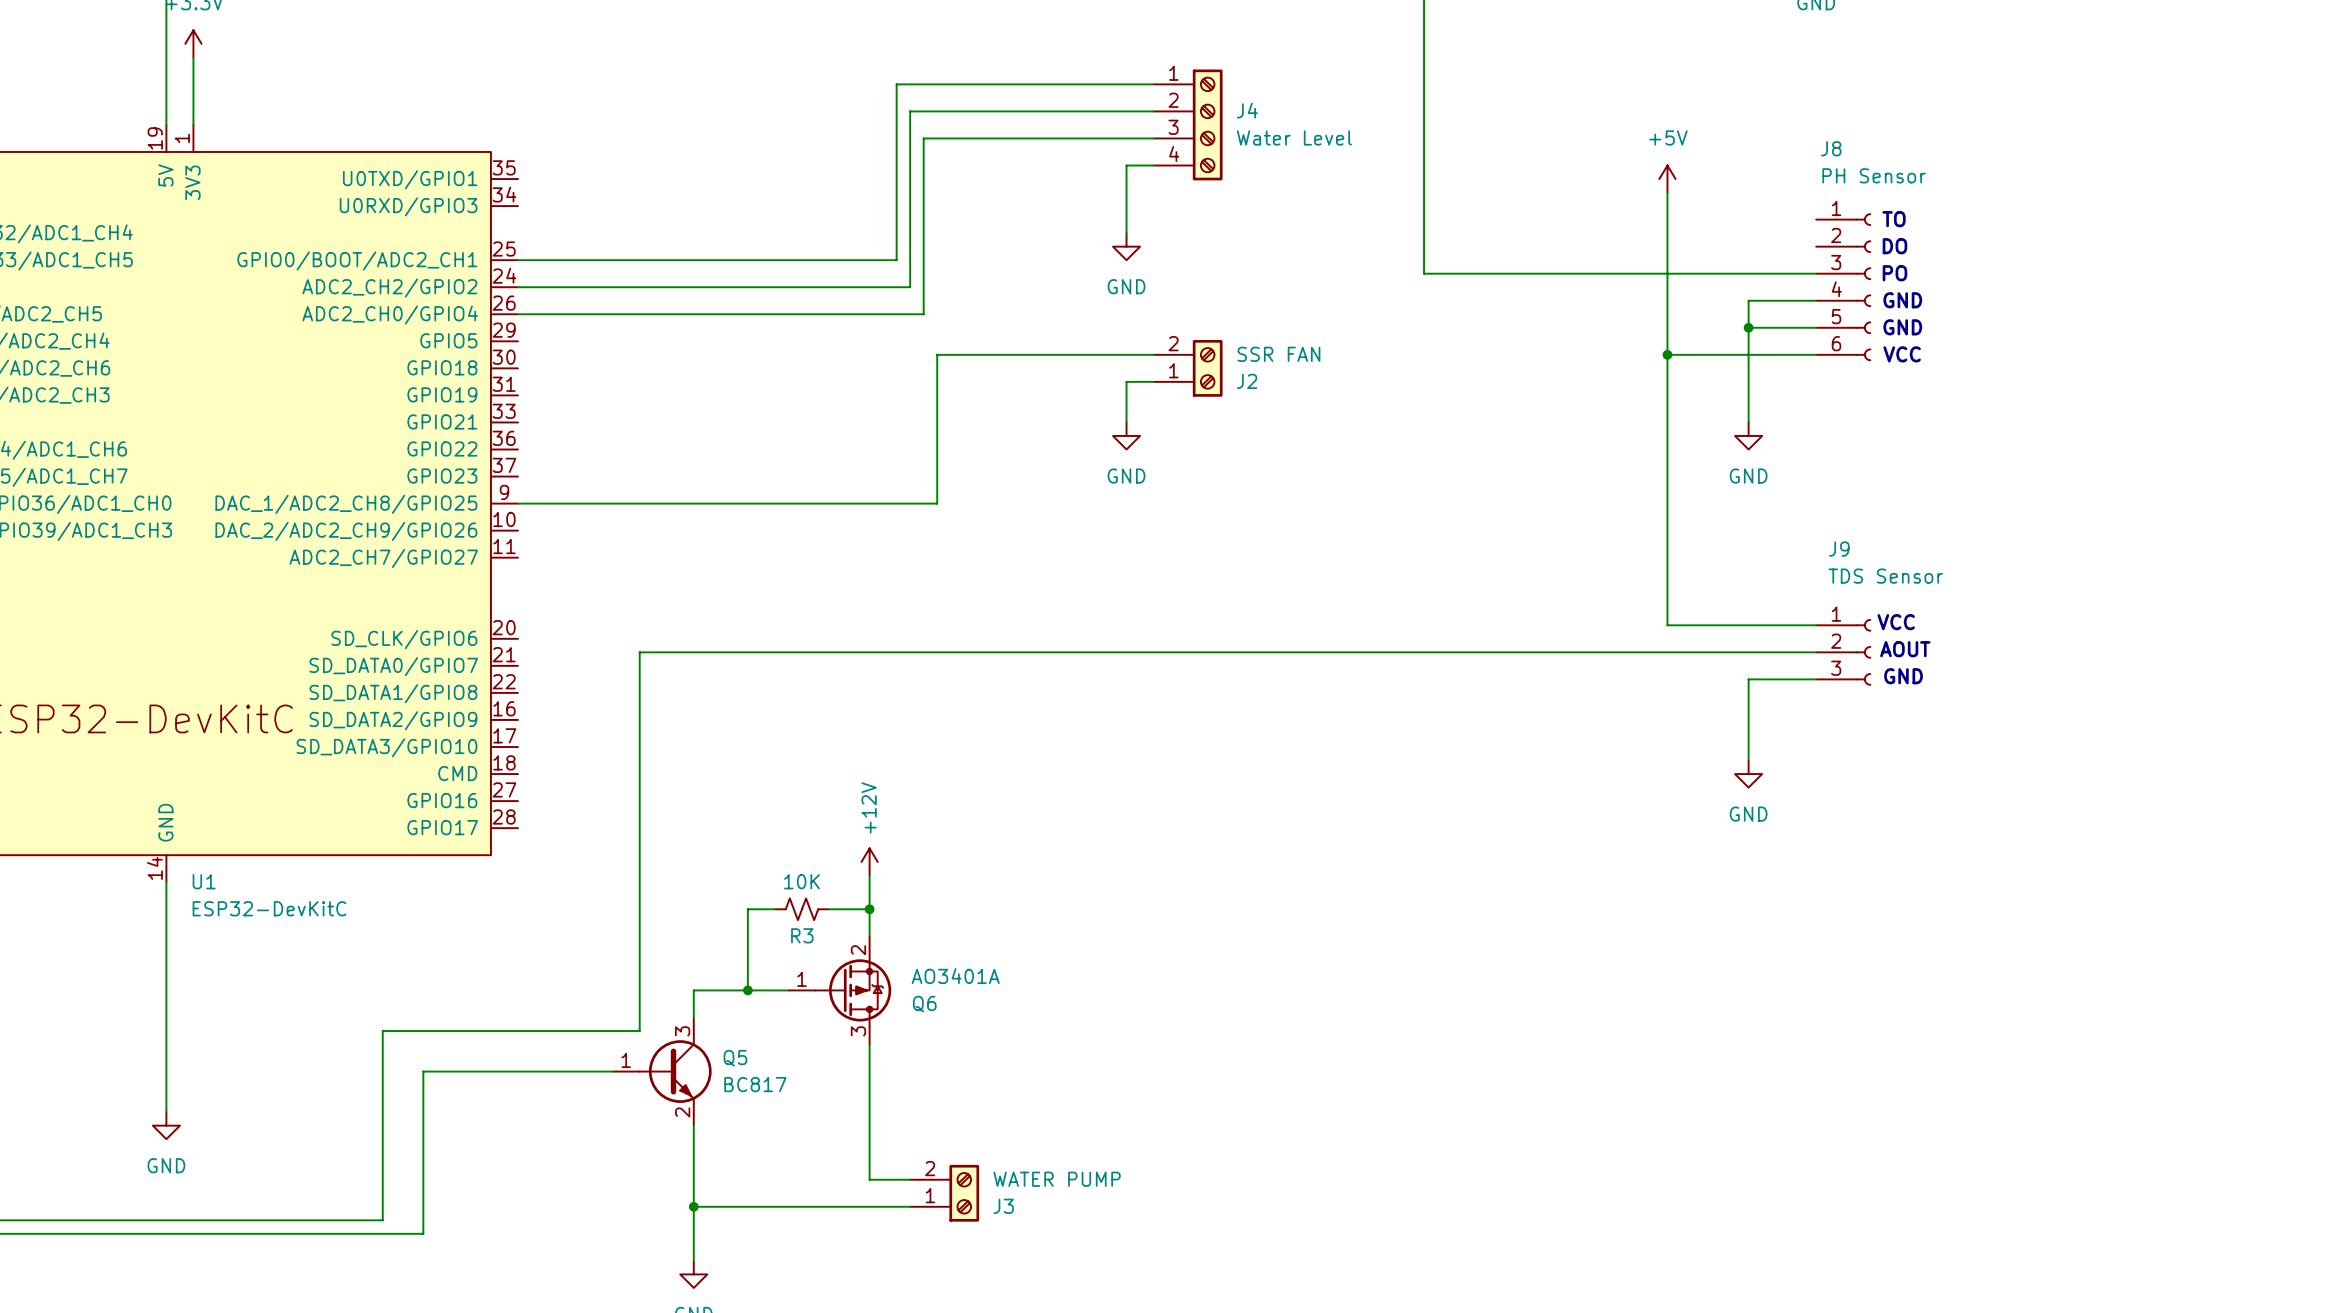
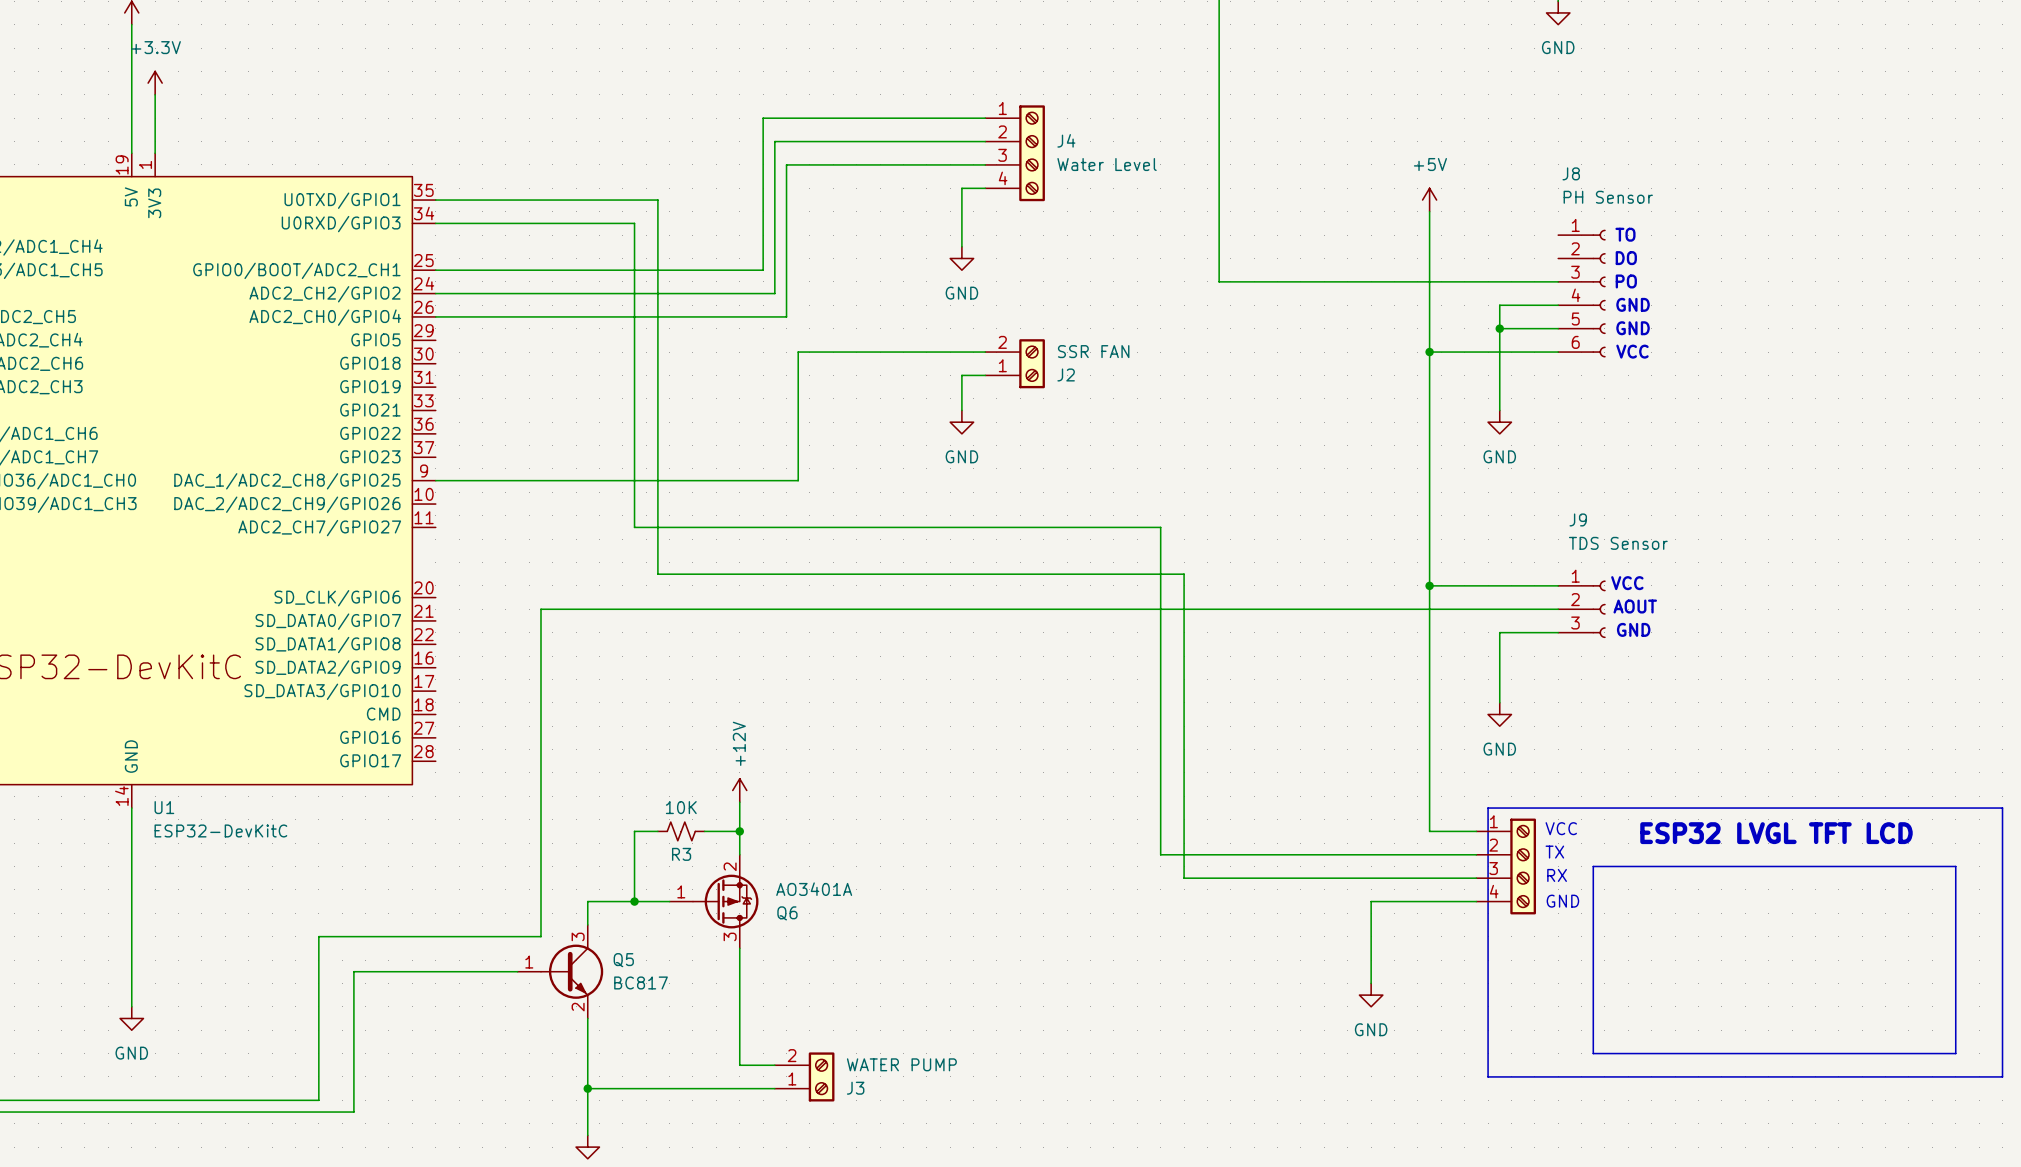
wire: none -> (435, 200) (657, 200) (657, 574) (1184, 574) (1184, 878) (1476, 878)
wire: none -> (435, 223) (634, 223) (634, 527) (1160, 527) (1160, 854) (1476, 854)
wire: none -> (1429, 585) (1429, 831) (1476, 831)
junction: none -> (1429, 585)
line: none -> (1488, 808) (2002, 808) (2002, 1076) (1488, 1076) (1488, 808)
text: none -> VCC (1561, 828)
text: none -> ESP32 LVGL TFT LCD (1776, 833)
text: none -> TX (1554, 852)
part: none -> (1506, 866)
line: none -> (1593, 866) (1955, 866) (1955, 1053) (1593, 1053) (1593, 866)
text: none -> RX (1557, 875)
text: none -> GND (1562, 901)
wire: none -> (1476, 901) (1371, 901) (1371, 983)
power symbol: none -> GND (1371, 995)

